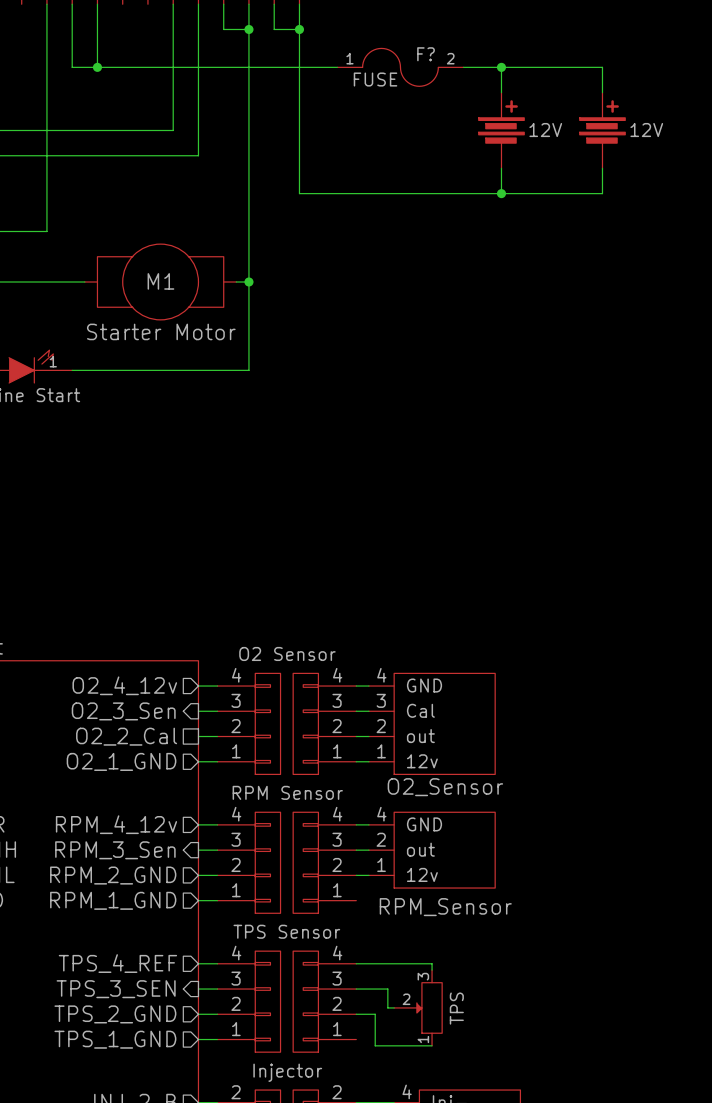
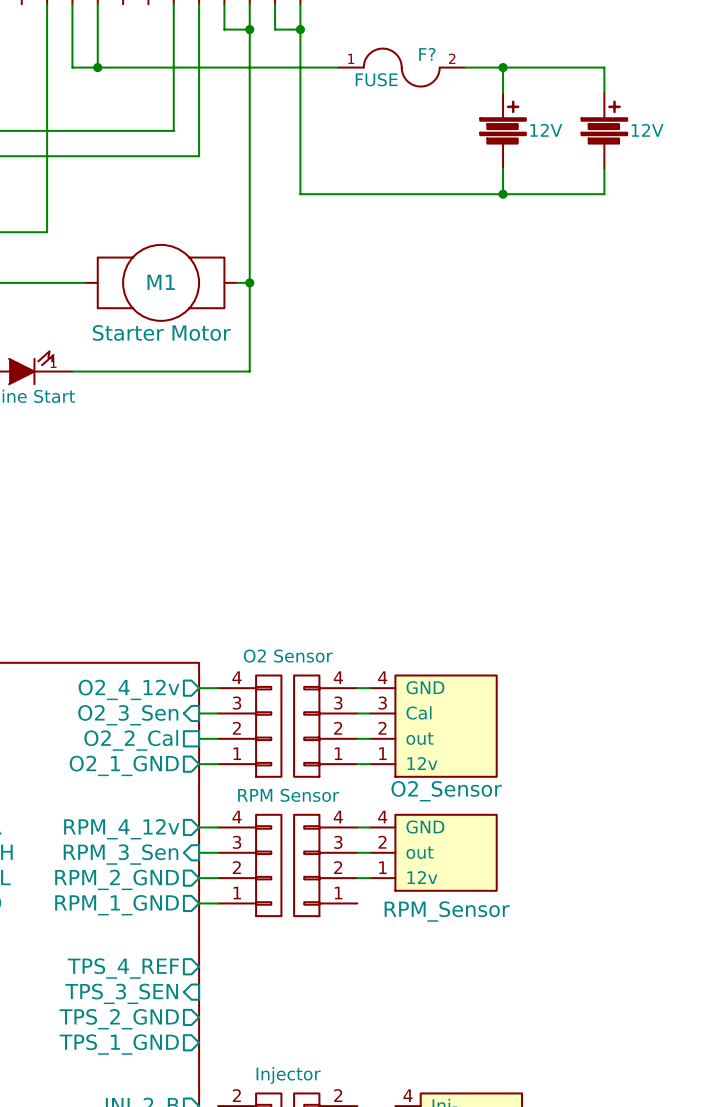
wire: (198, 963) (217, 963) -> none
wire: (356, 963) (432, 963) (432, 970) -> none
wire: (198, 989) (217, 989) -> none
wire: (356, 989) (387, 989) (387, 1007) (394, 1007) -> none
part: (248, 1001) -> none
part: TPS Sensor (324, 1001) -> none
TPS: (418, 1007) -> none
wire: (198, 1014) (217, 1014) -> none
wire: (356, 1014) (375, 1014) (375, 1045) (432, 1045) -> none
wire: (198, 1039) (217, 1039) -> none
wire: (198, 1102) (217, 1102) -> none
wire: (356, 1102) (394, 1102) -> none

